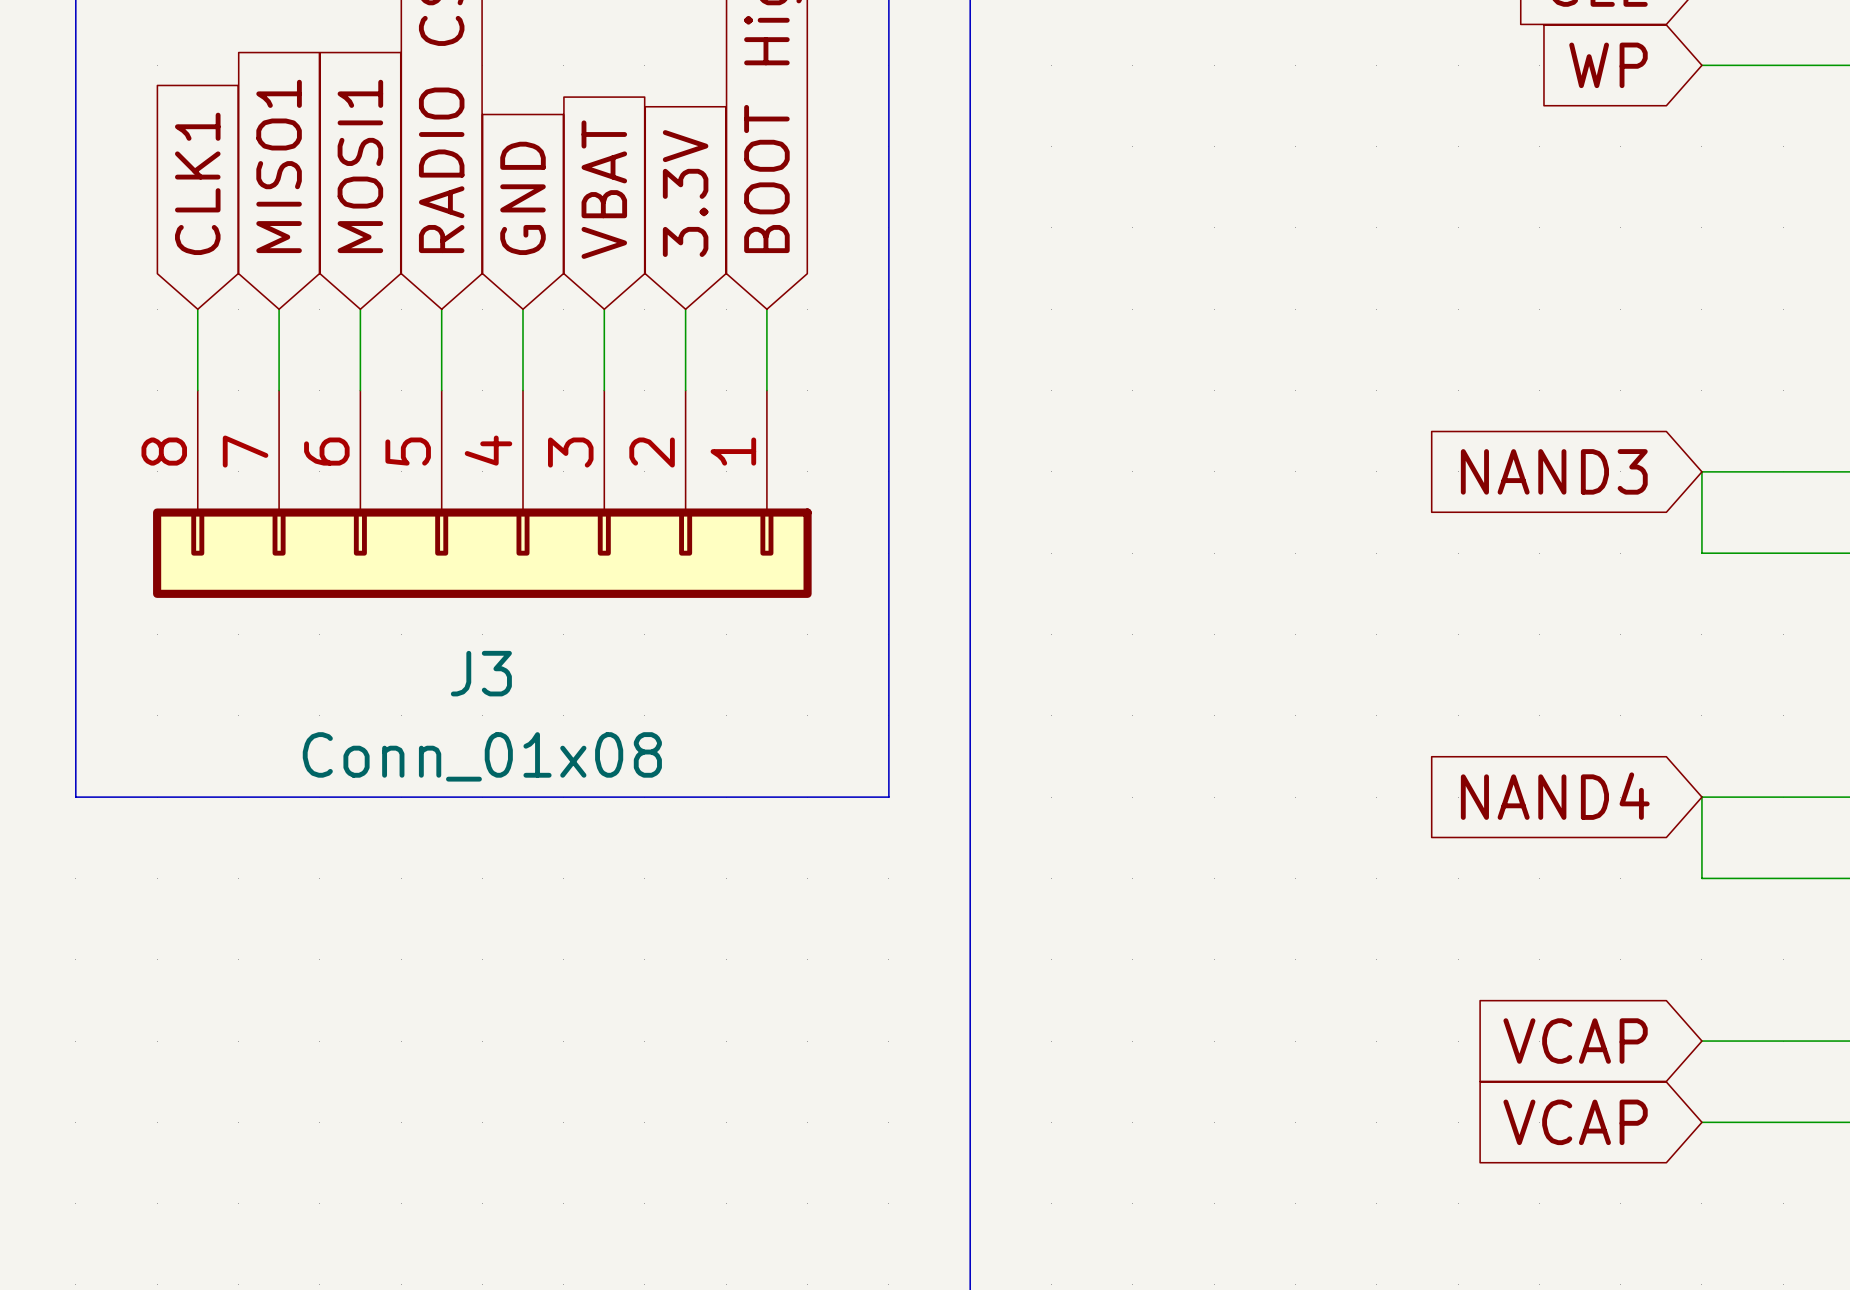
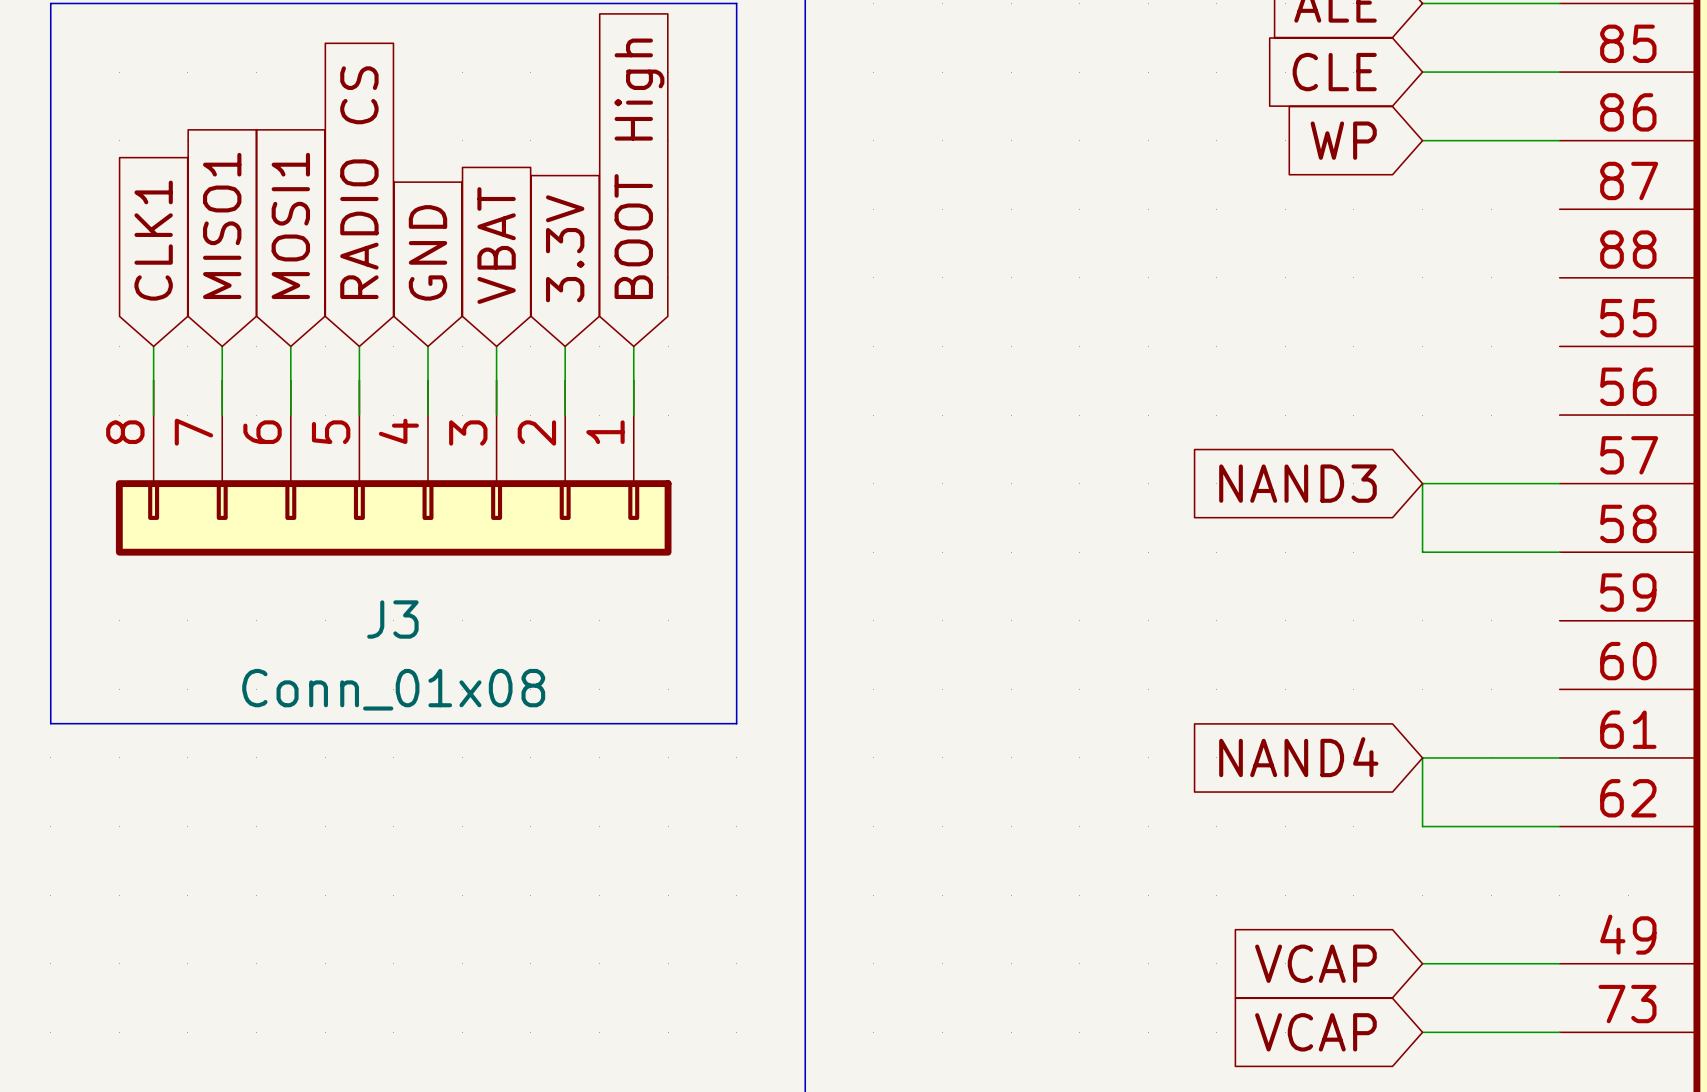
J3 position: (482, 494) -> (393, 468)
line: (75, 756) (75, 797) (888, 797) (888, 756) -> (50, 723) (736, 723)

